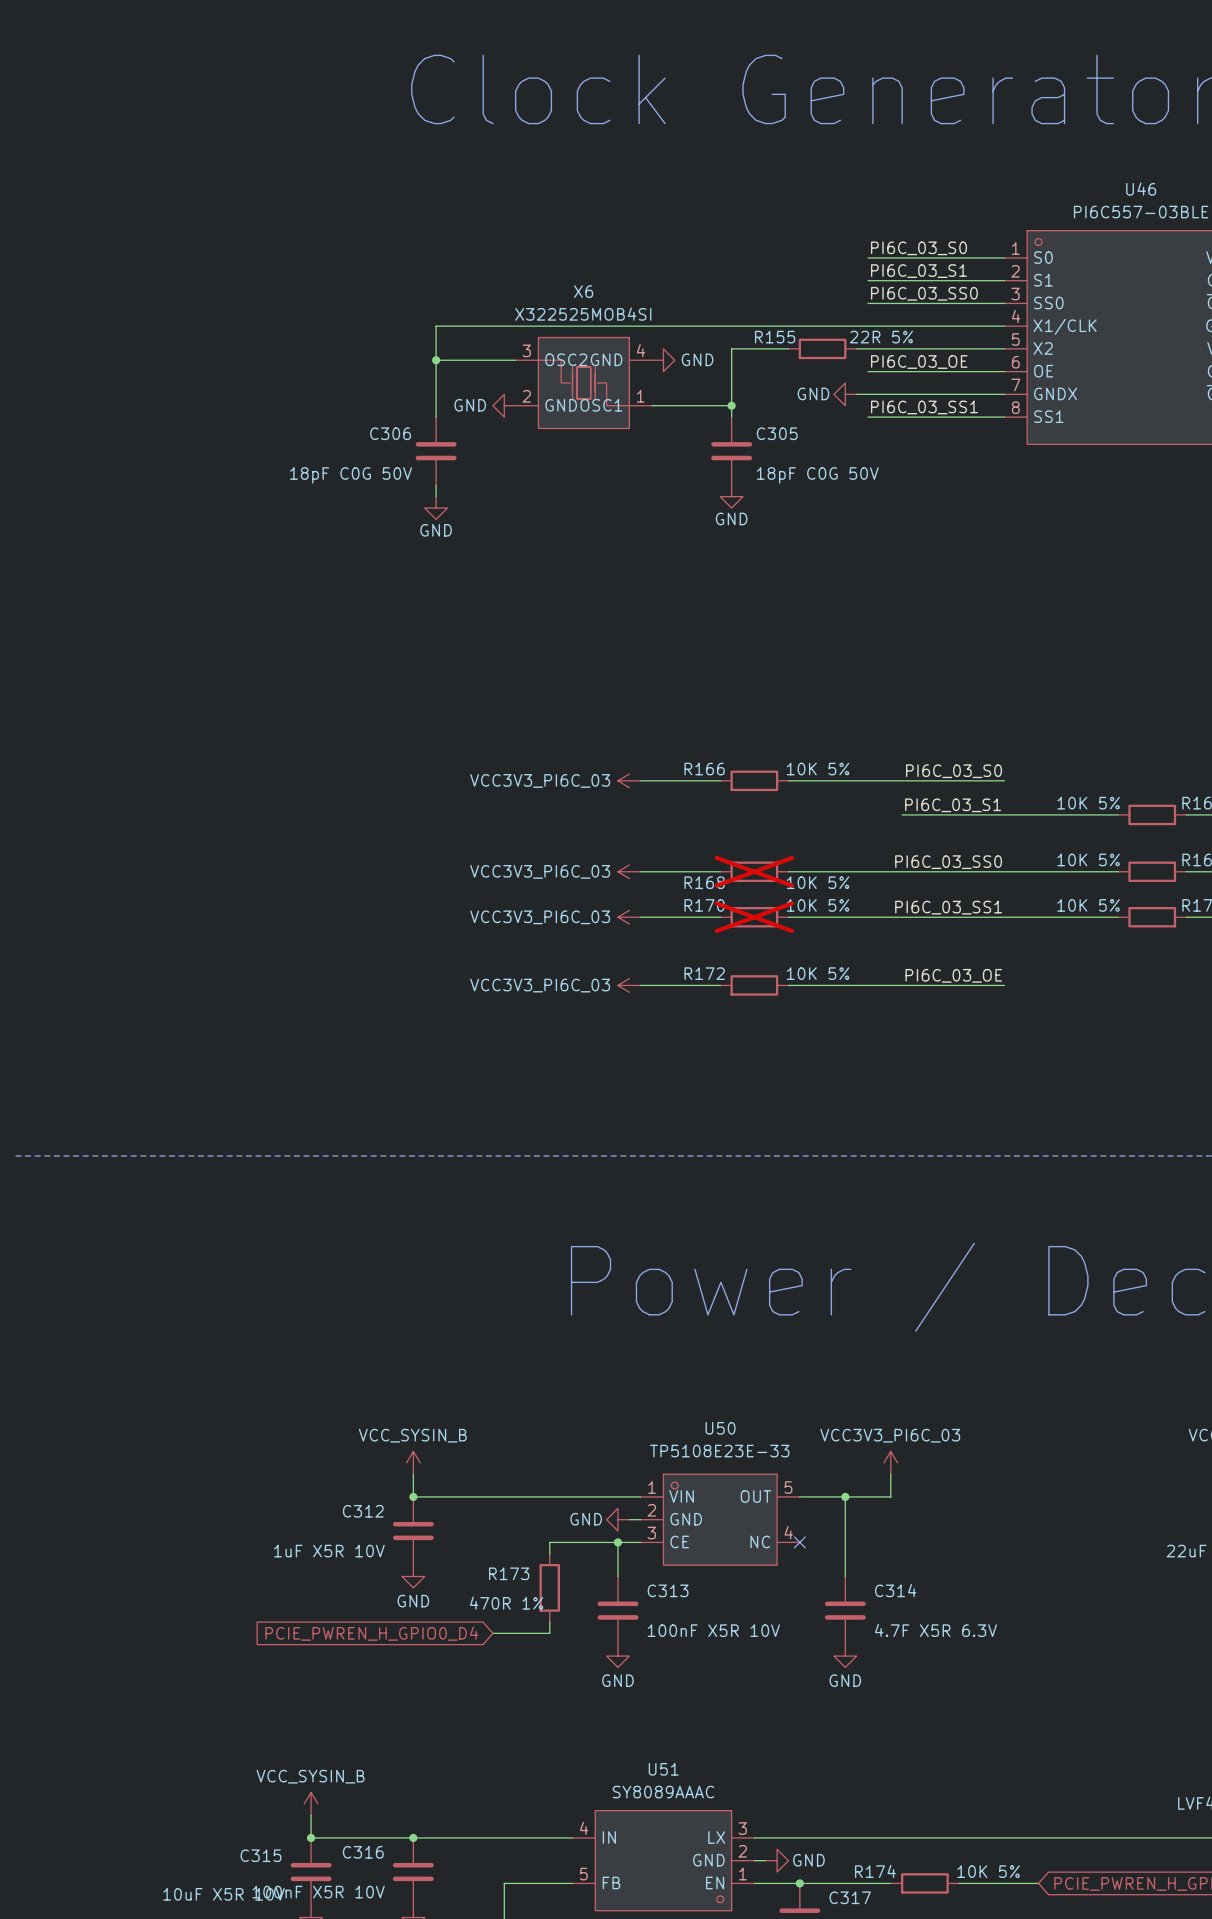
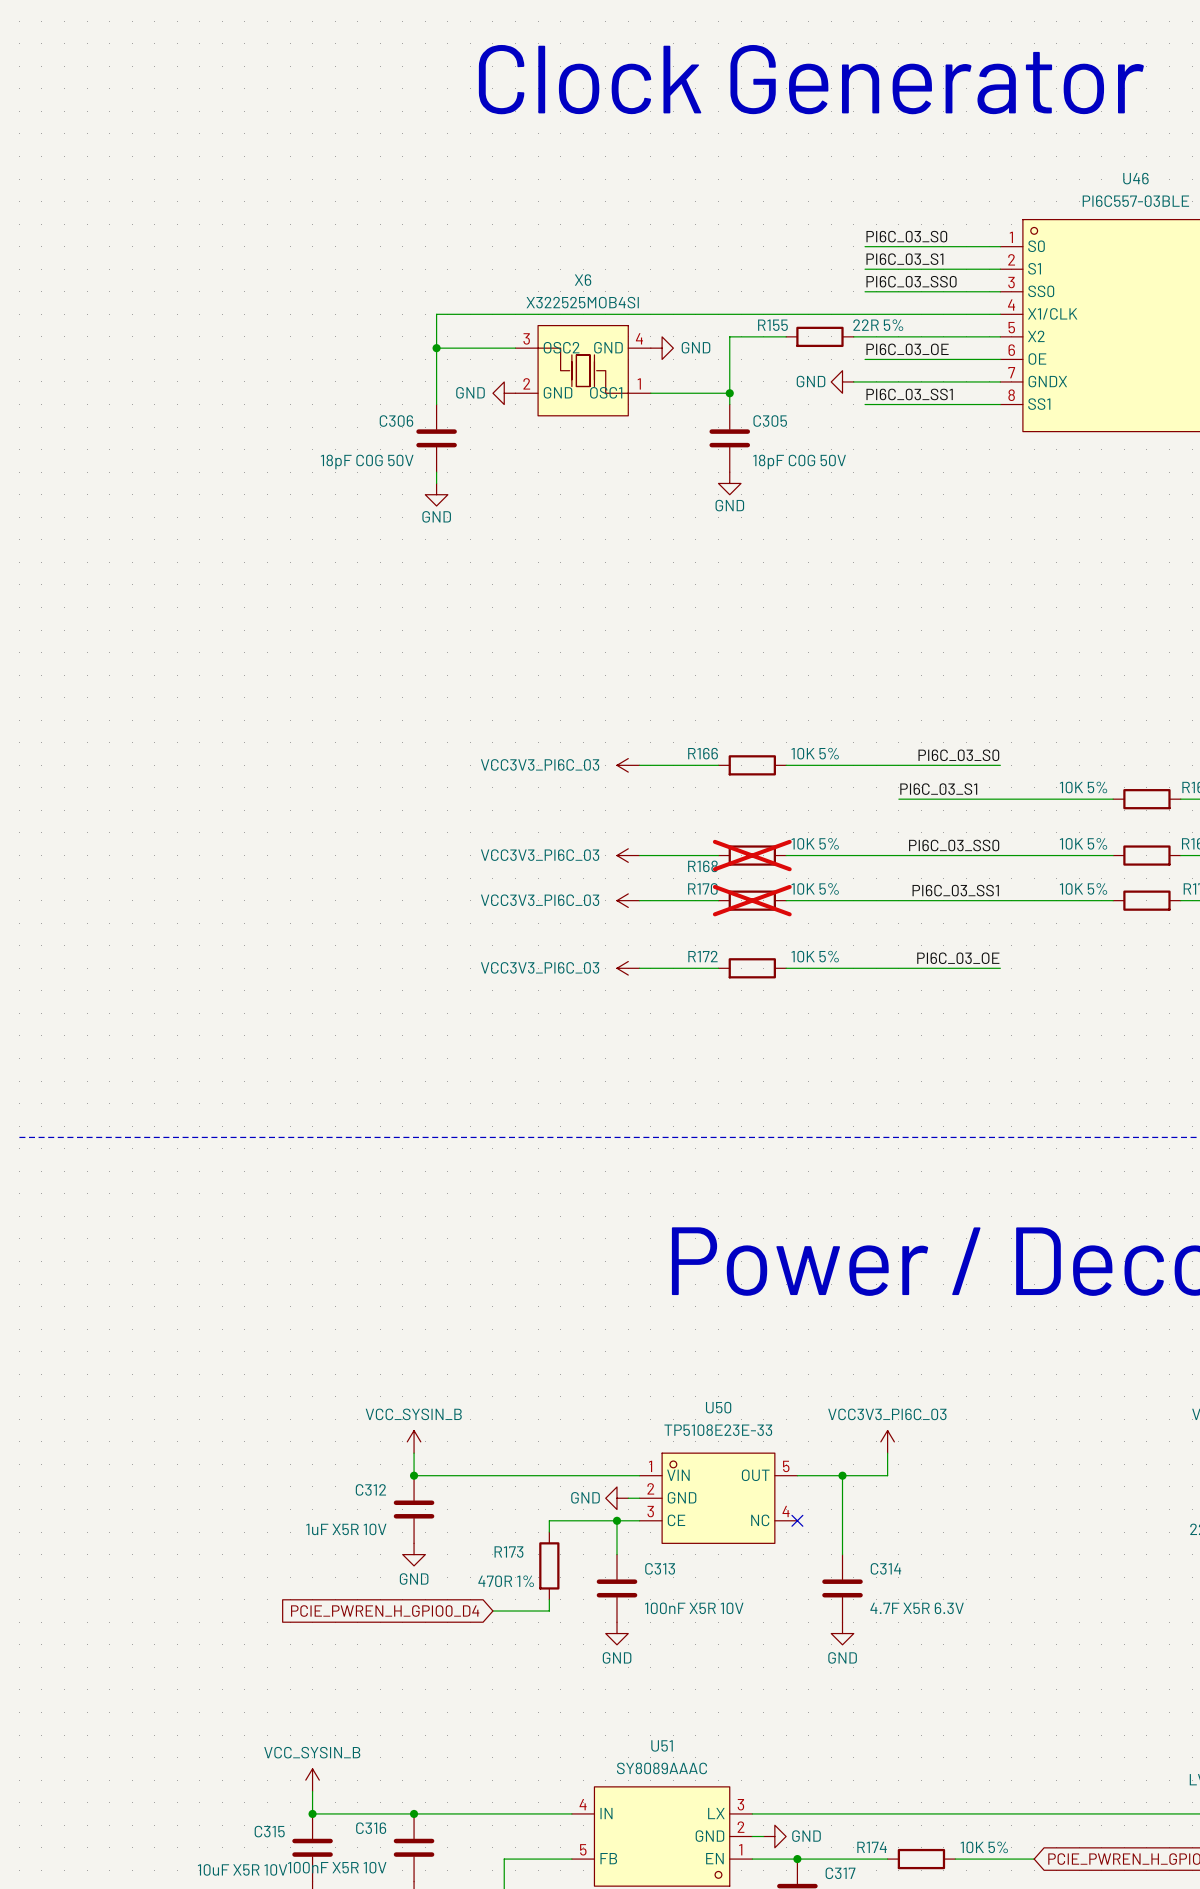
R168 value position: 10K 5% (818, 882) -> 10K 5% (815, 843)

